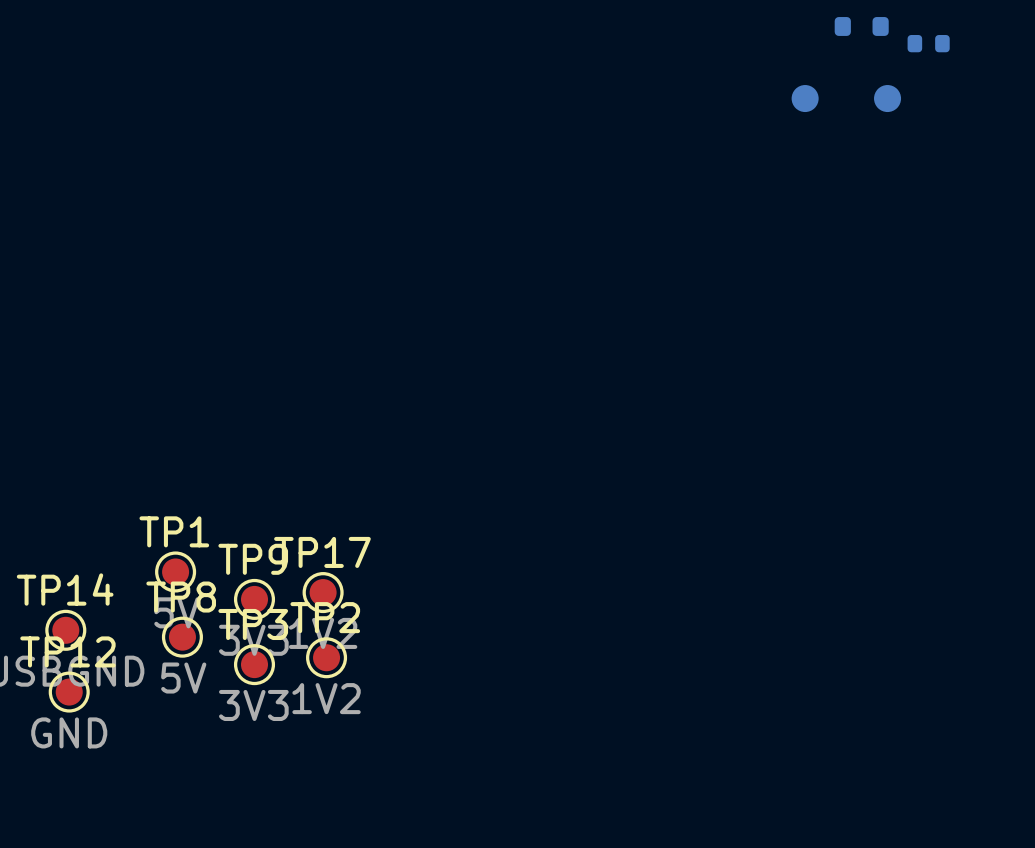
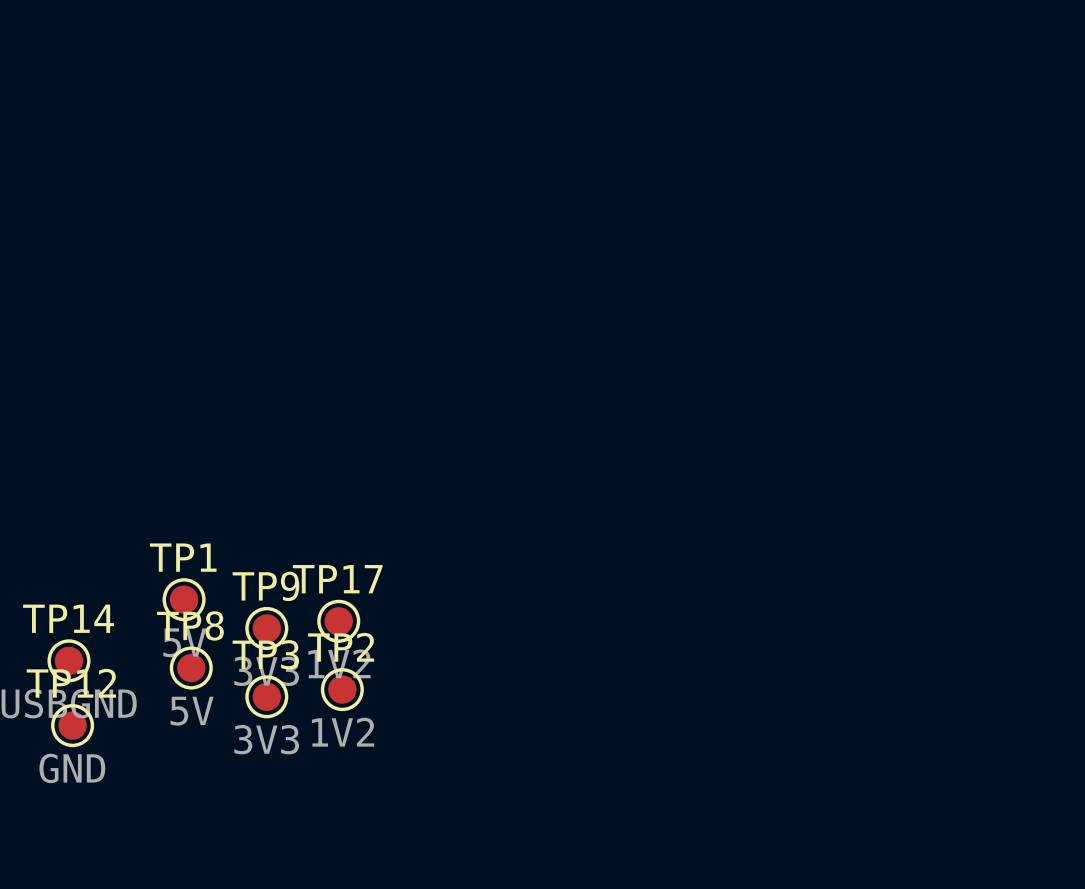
part: (861, 26) -> none
part: (928, 43) -> none
part: (805, 98) -> none
part: (887, 98) -> none

